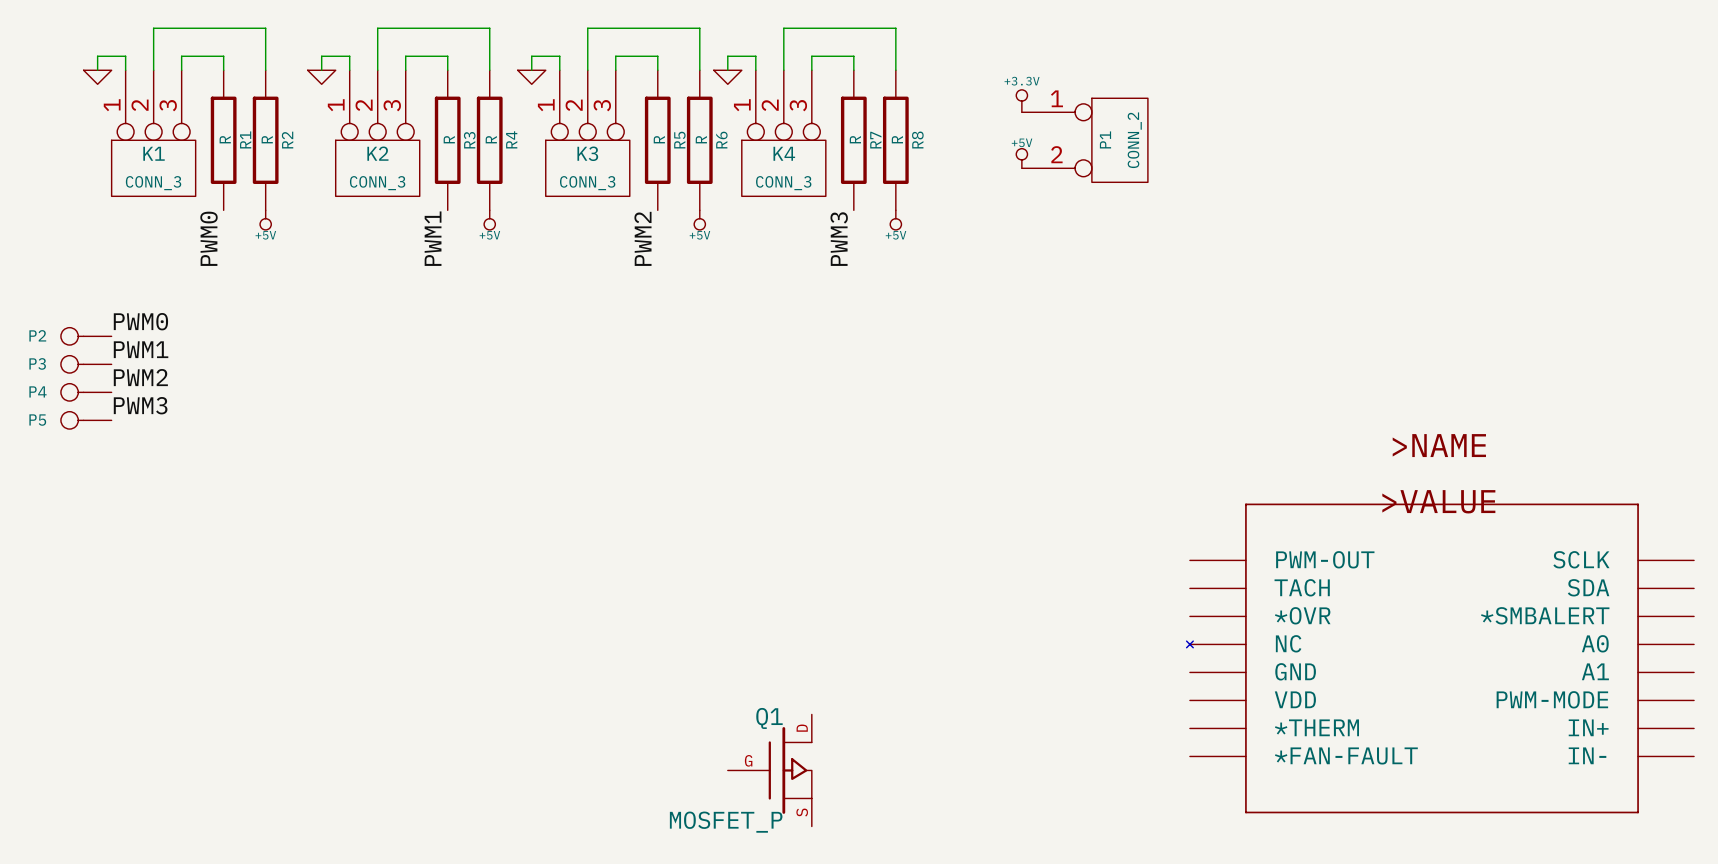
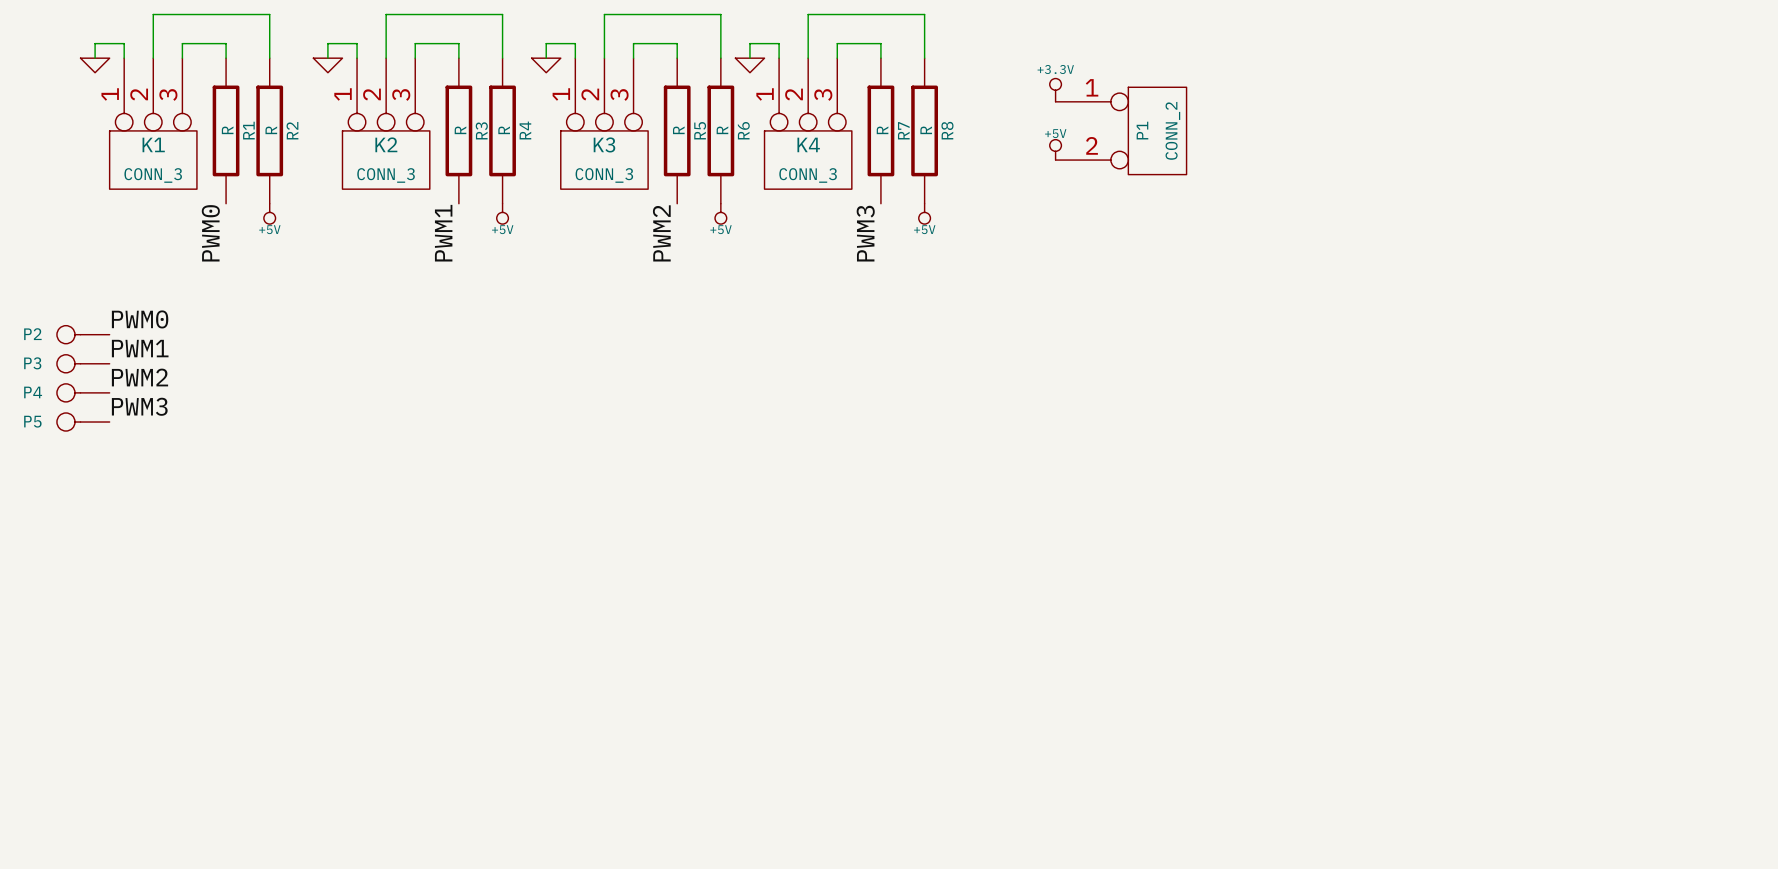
part: (1440, 658) -> none
Q1: MOSFET_P (769, 770) -> none

